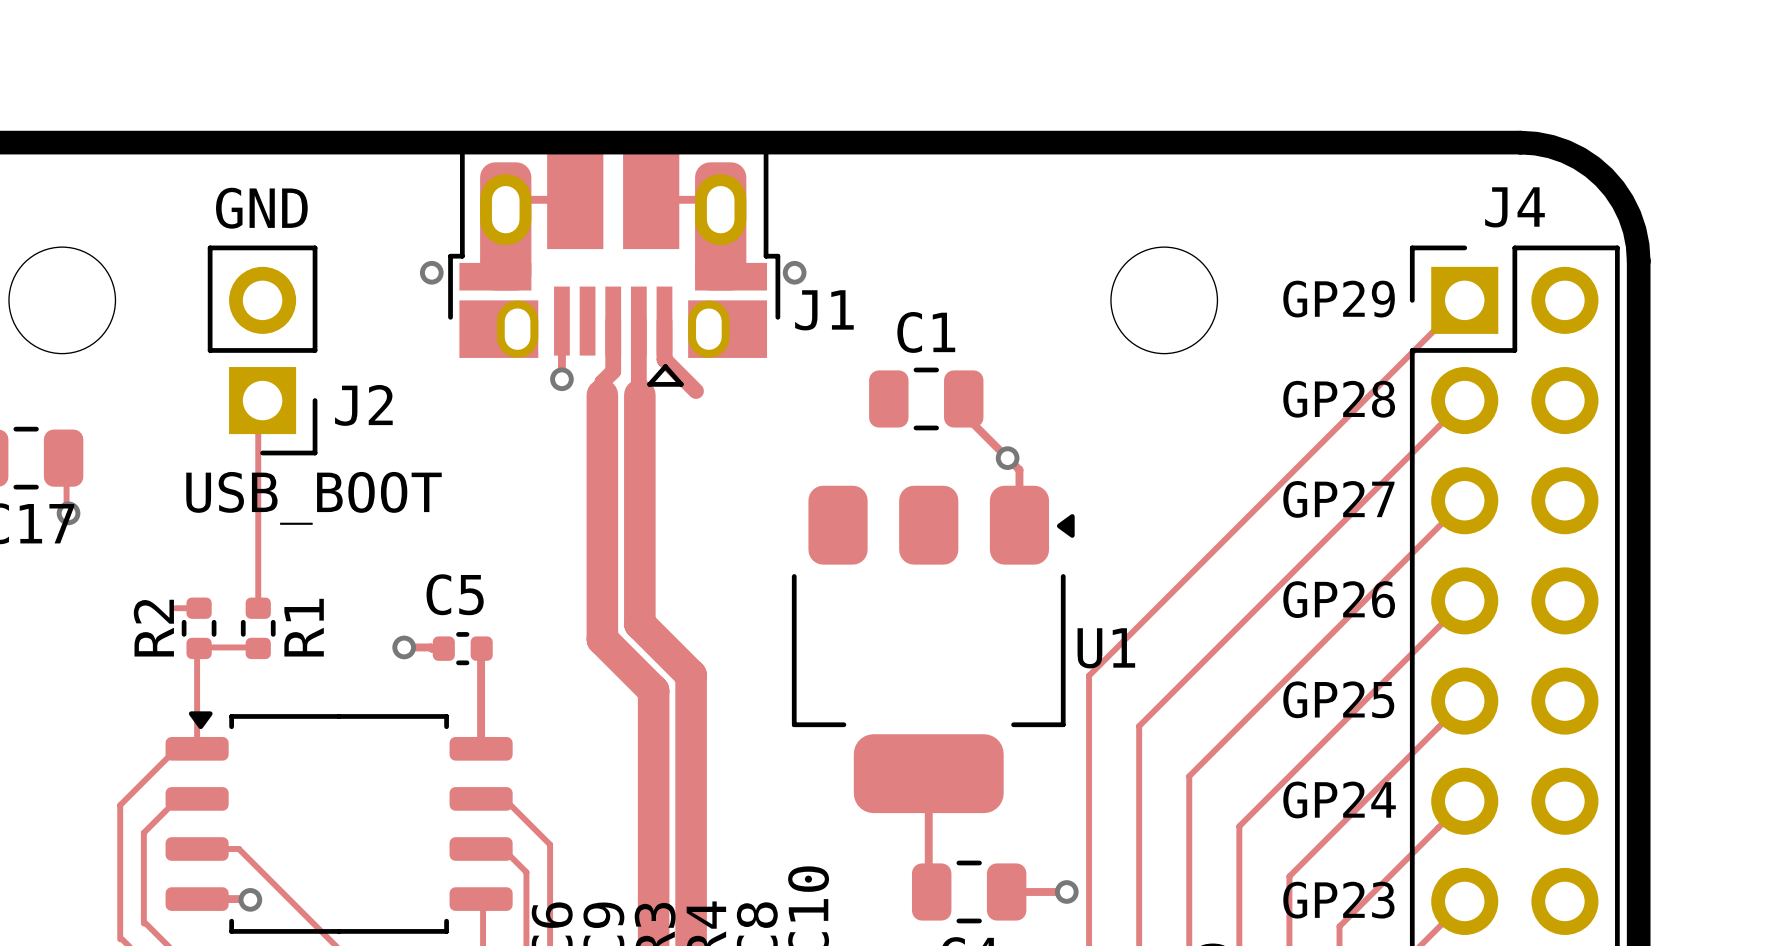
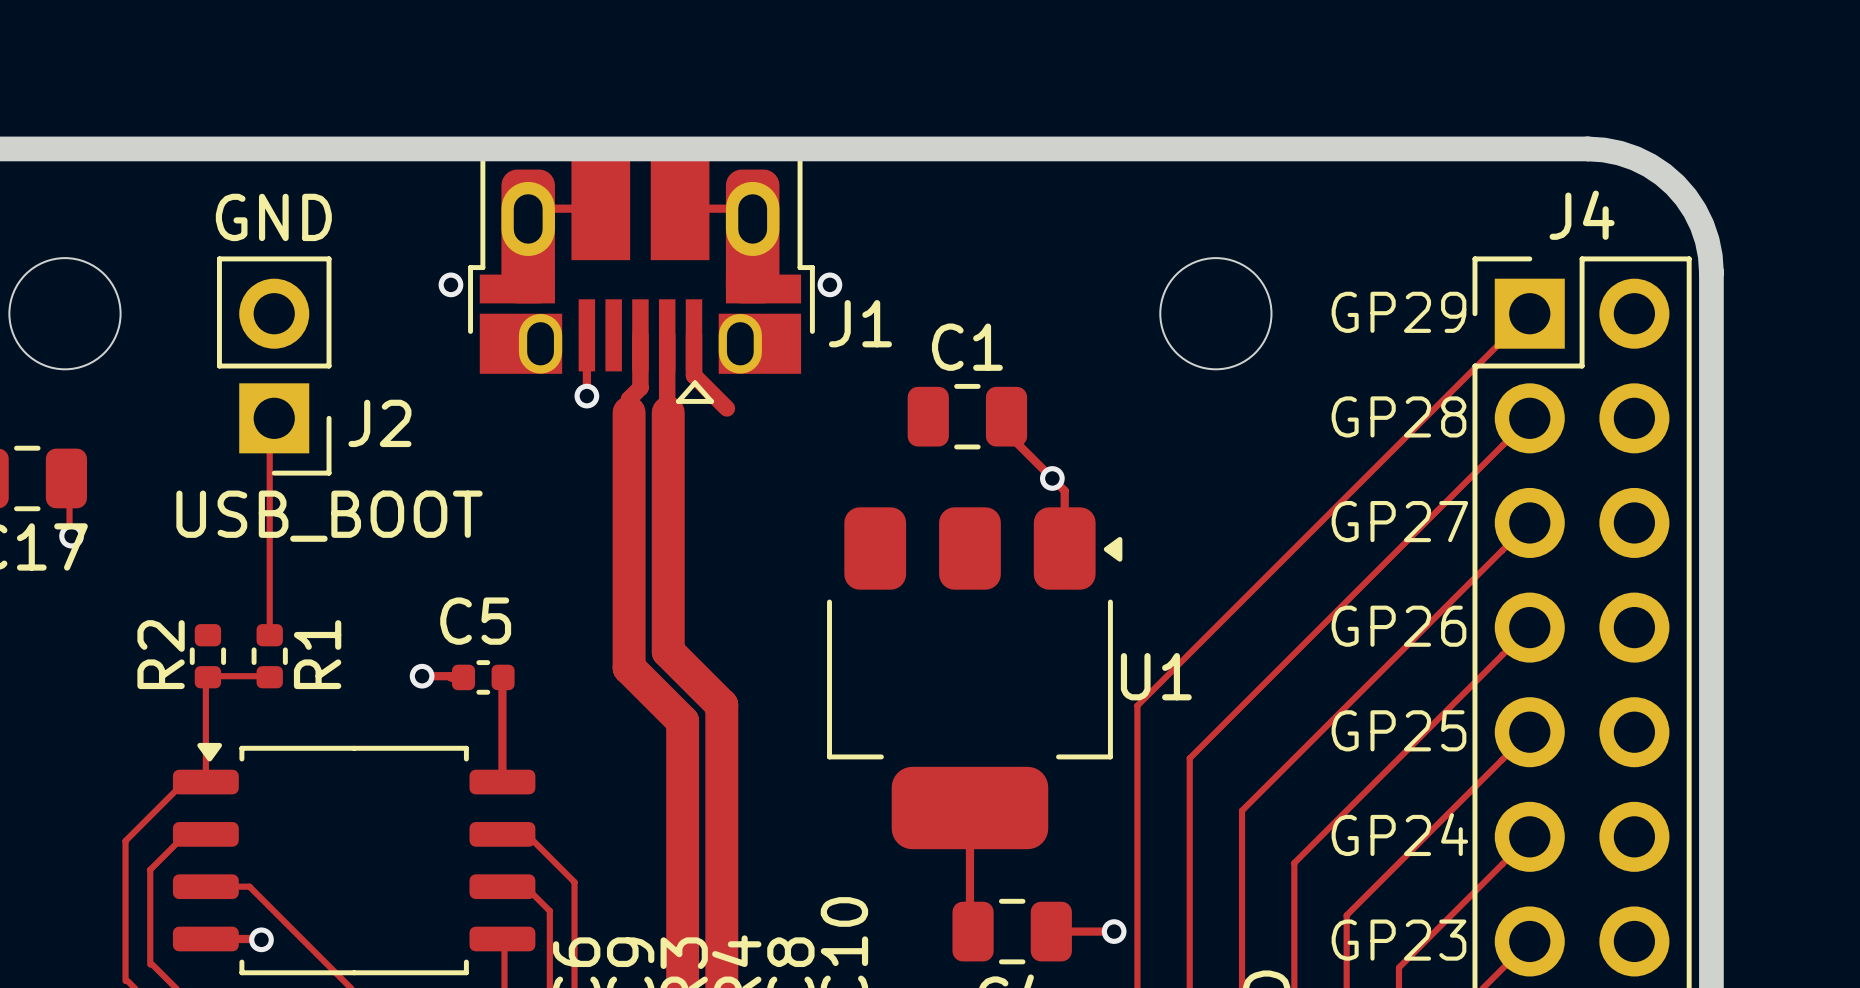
track: (175, 608) (199, 608) -> none

